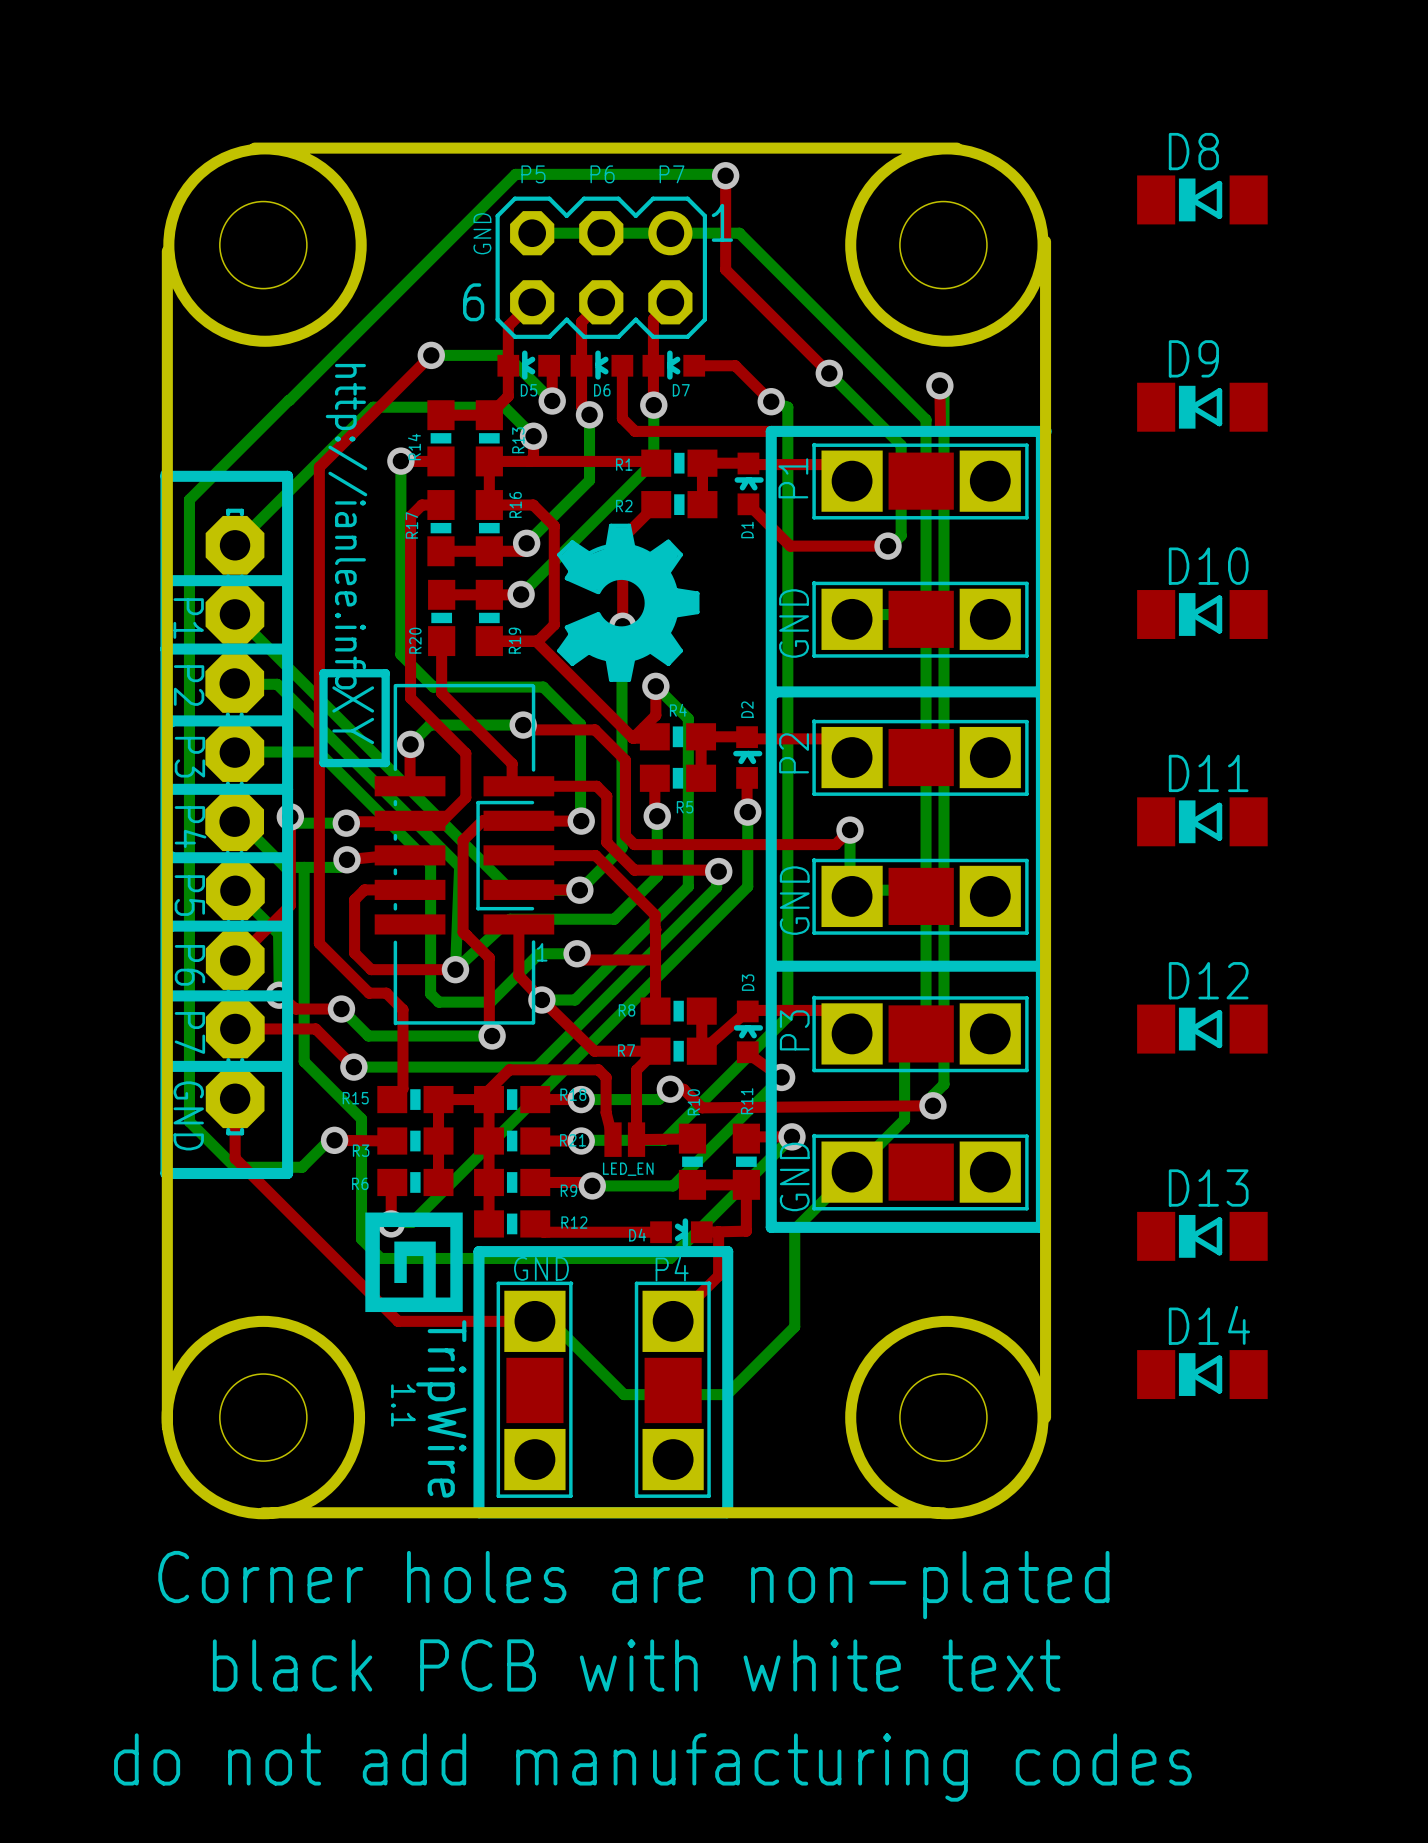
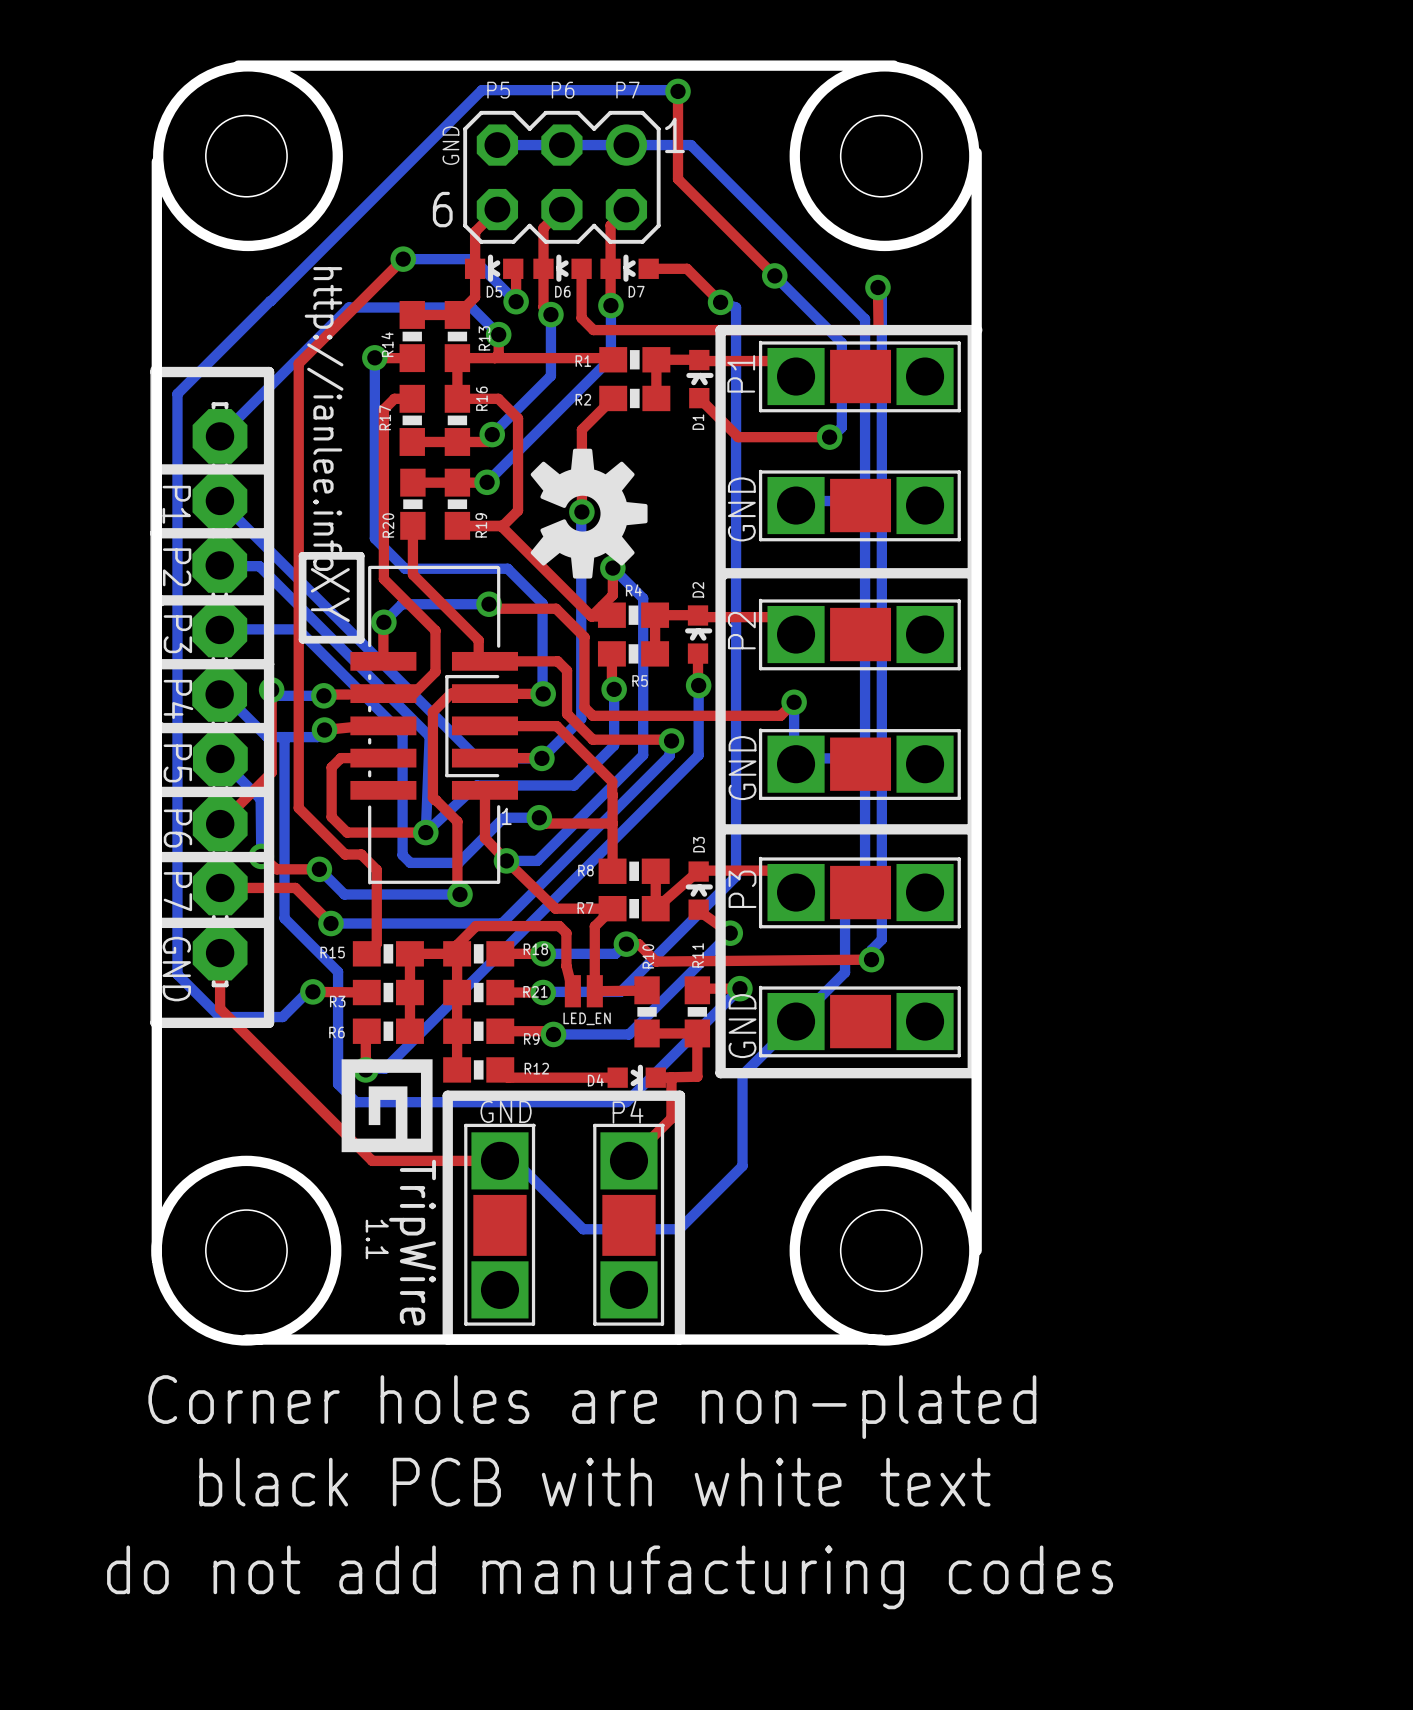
D8: (1202, 199) -> none
D9: (1202, 407) -> none
drawing shape: [557, 523, 700, 682] -> [530, 448, 648, 579]
D10: (1202, 614) -> none
D11: (1202, 821) -> none
D12: (1202, 1029) -> none
D13: (1202, 1236) -> none
D14: (1202, 1374) -> none

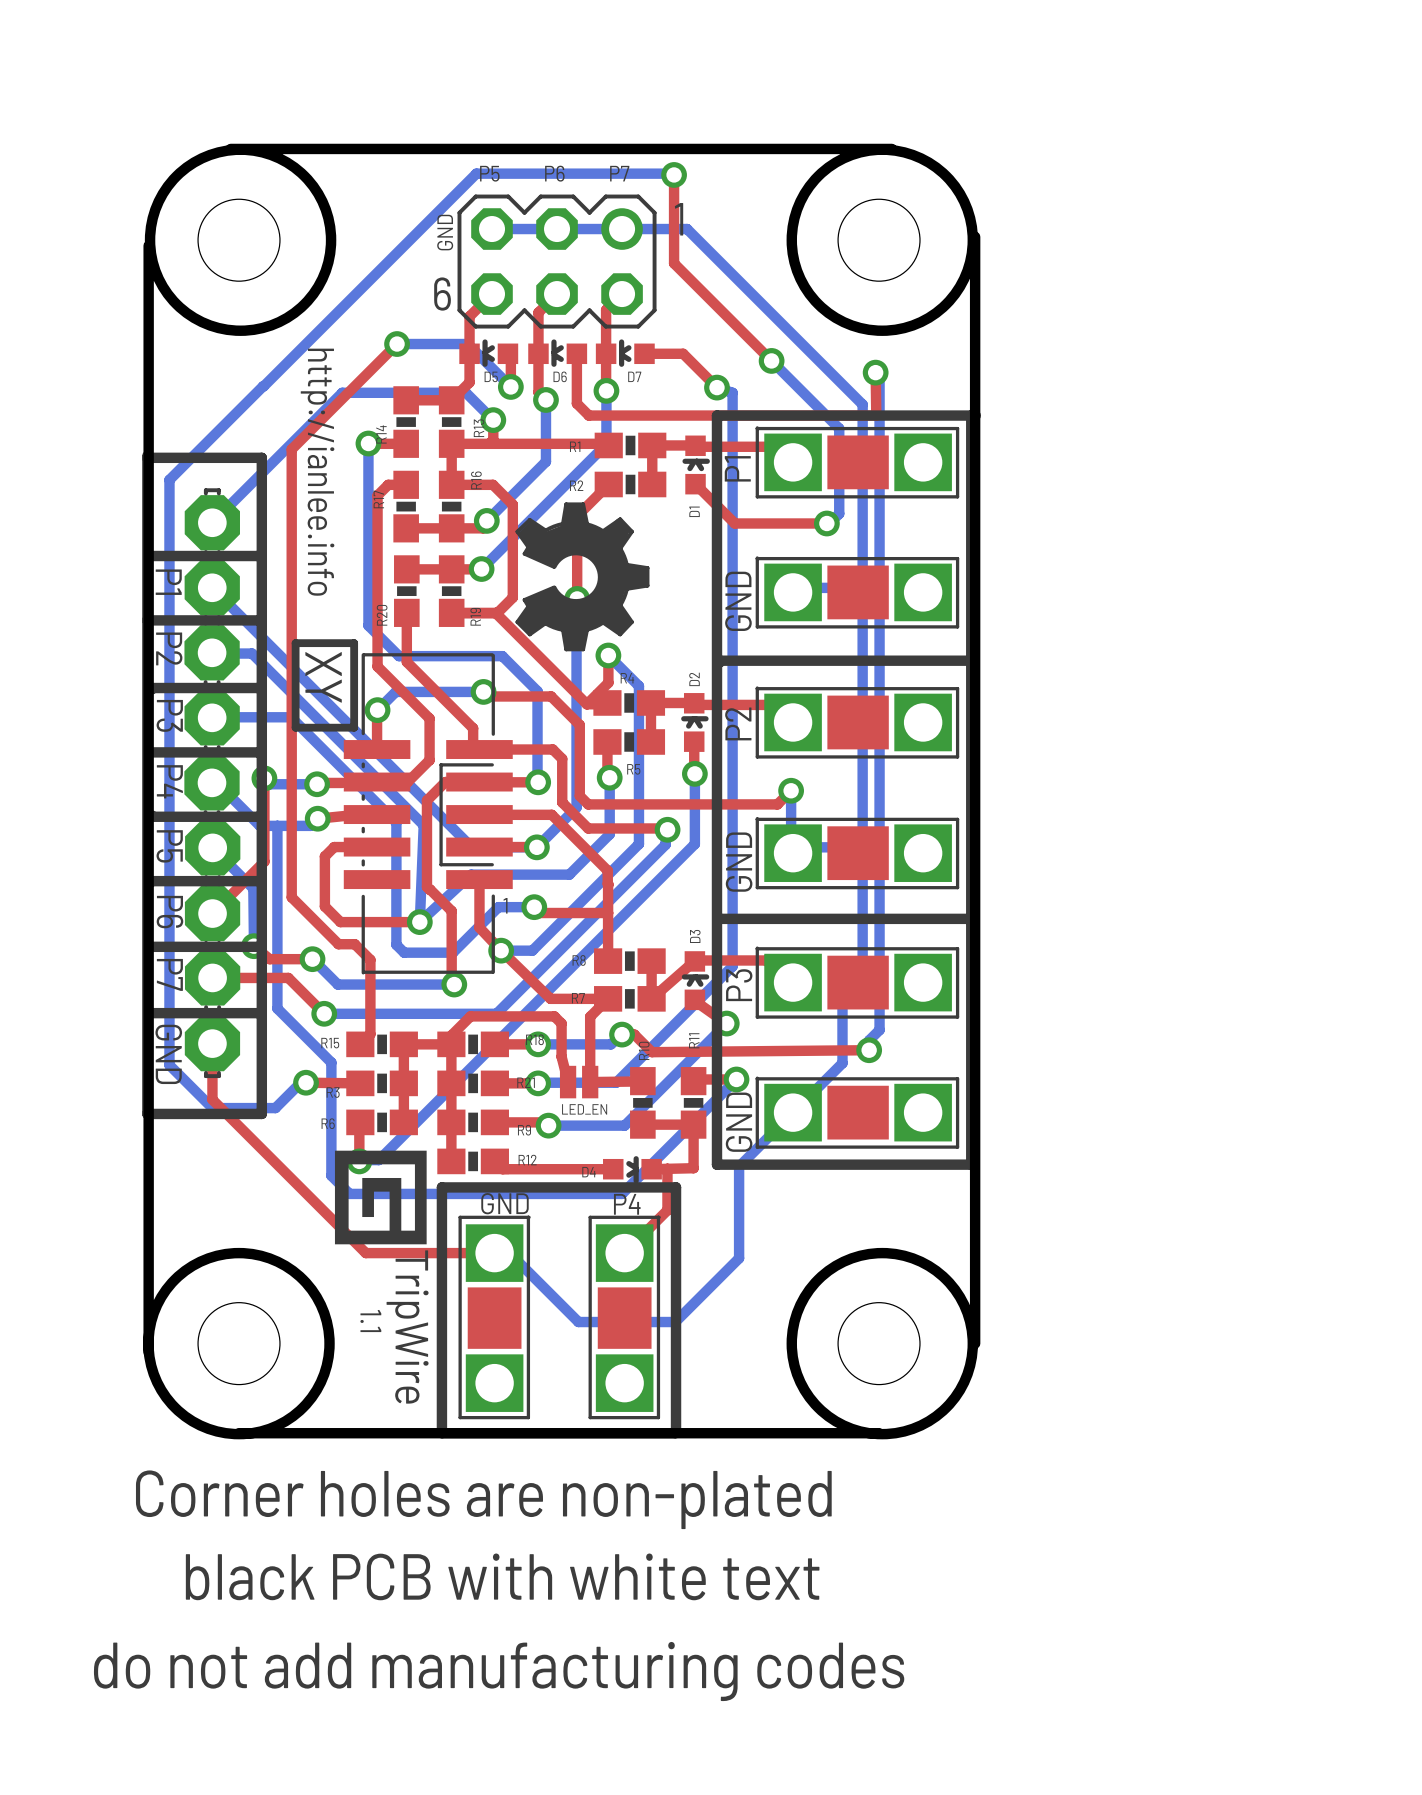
drawing shape: [530, 448, 648, 579] -> [515, 502, 650, 652]

